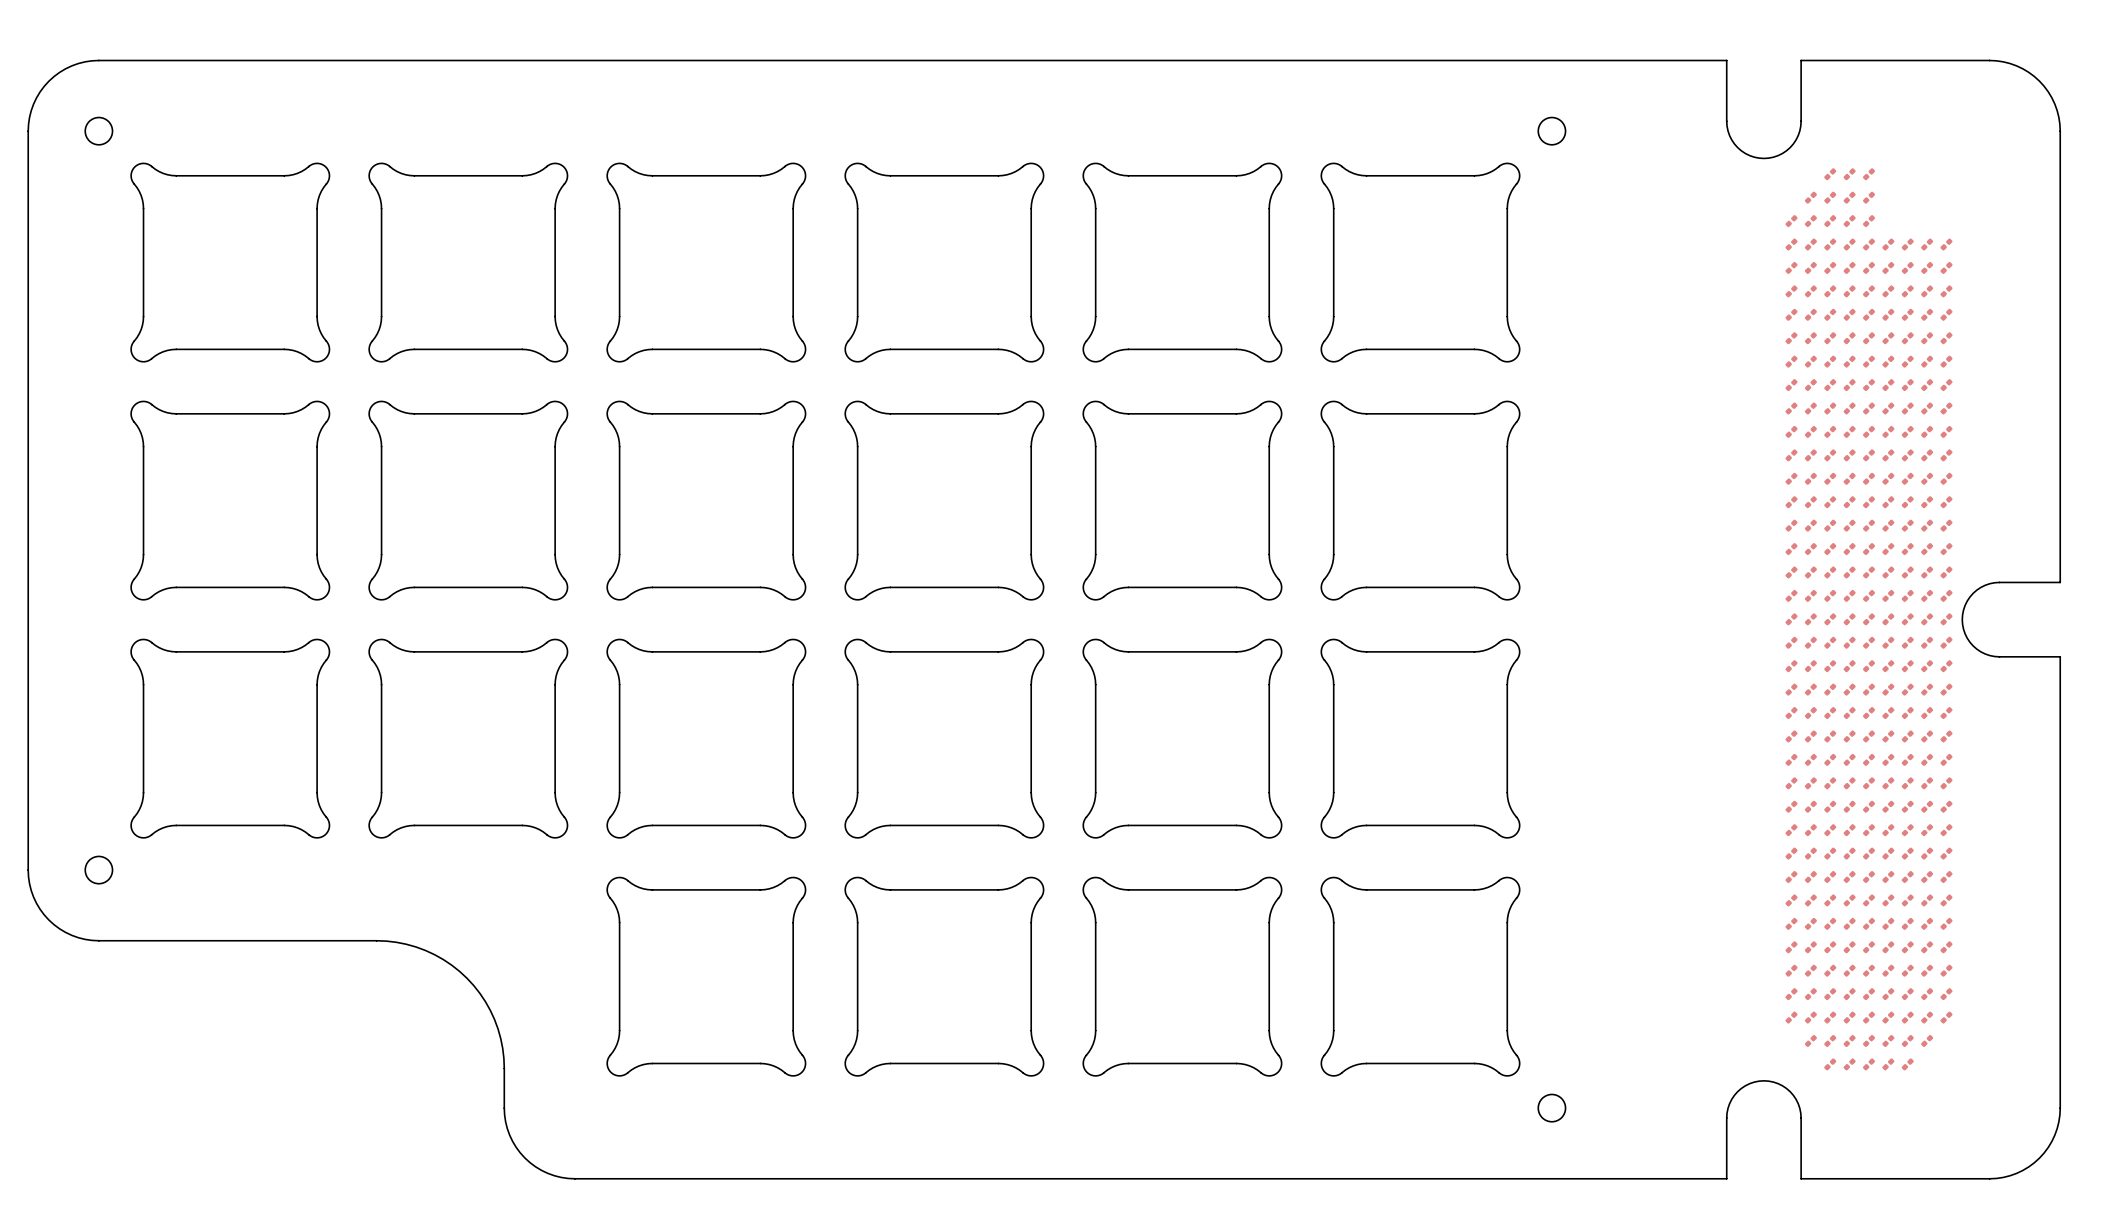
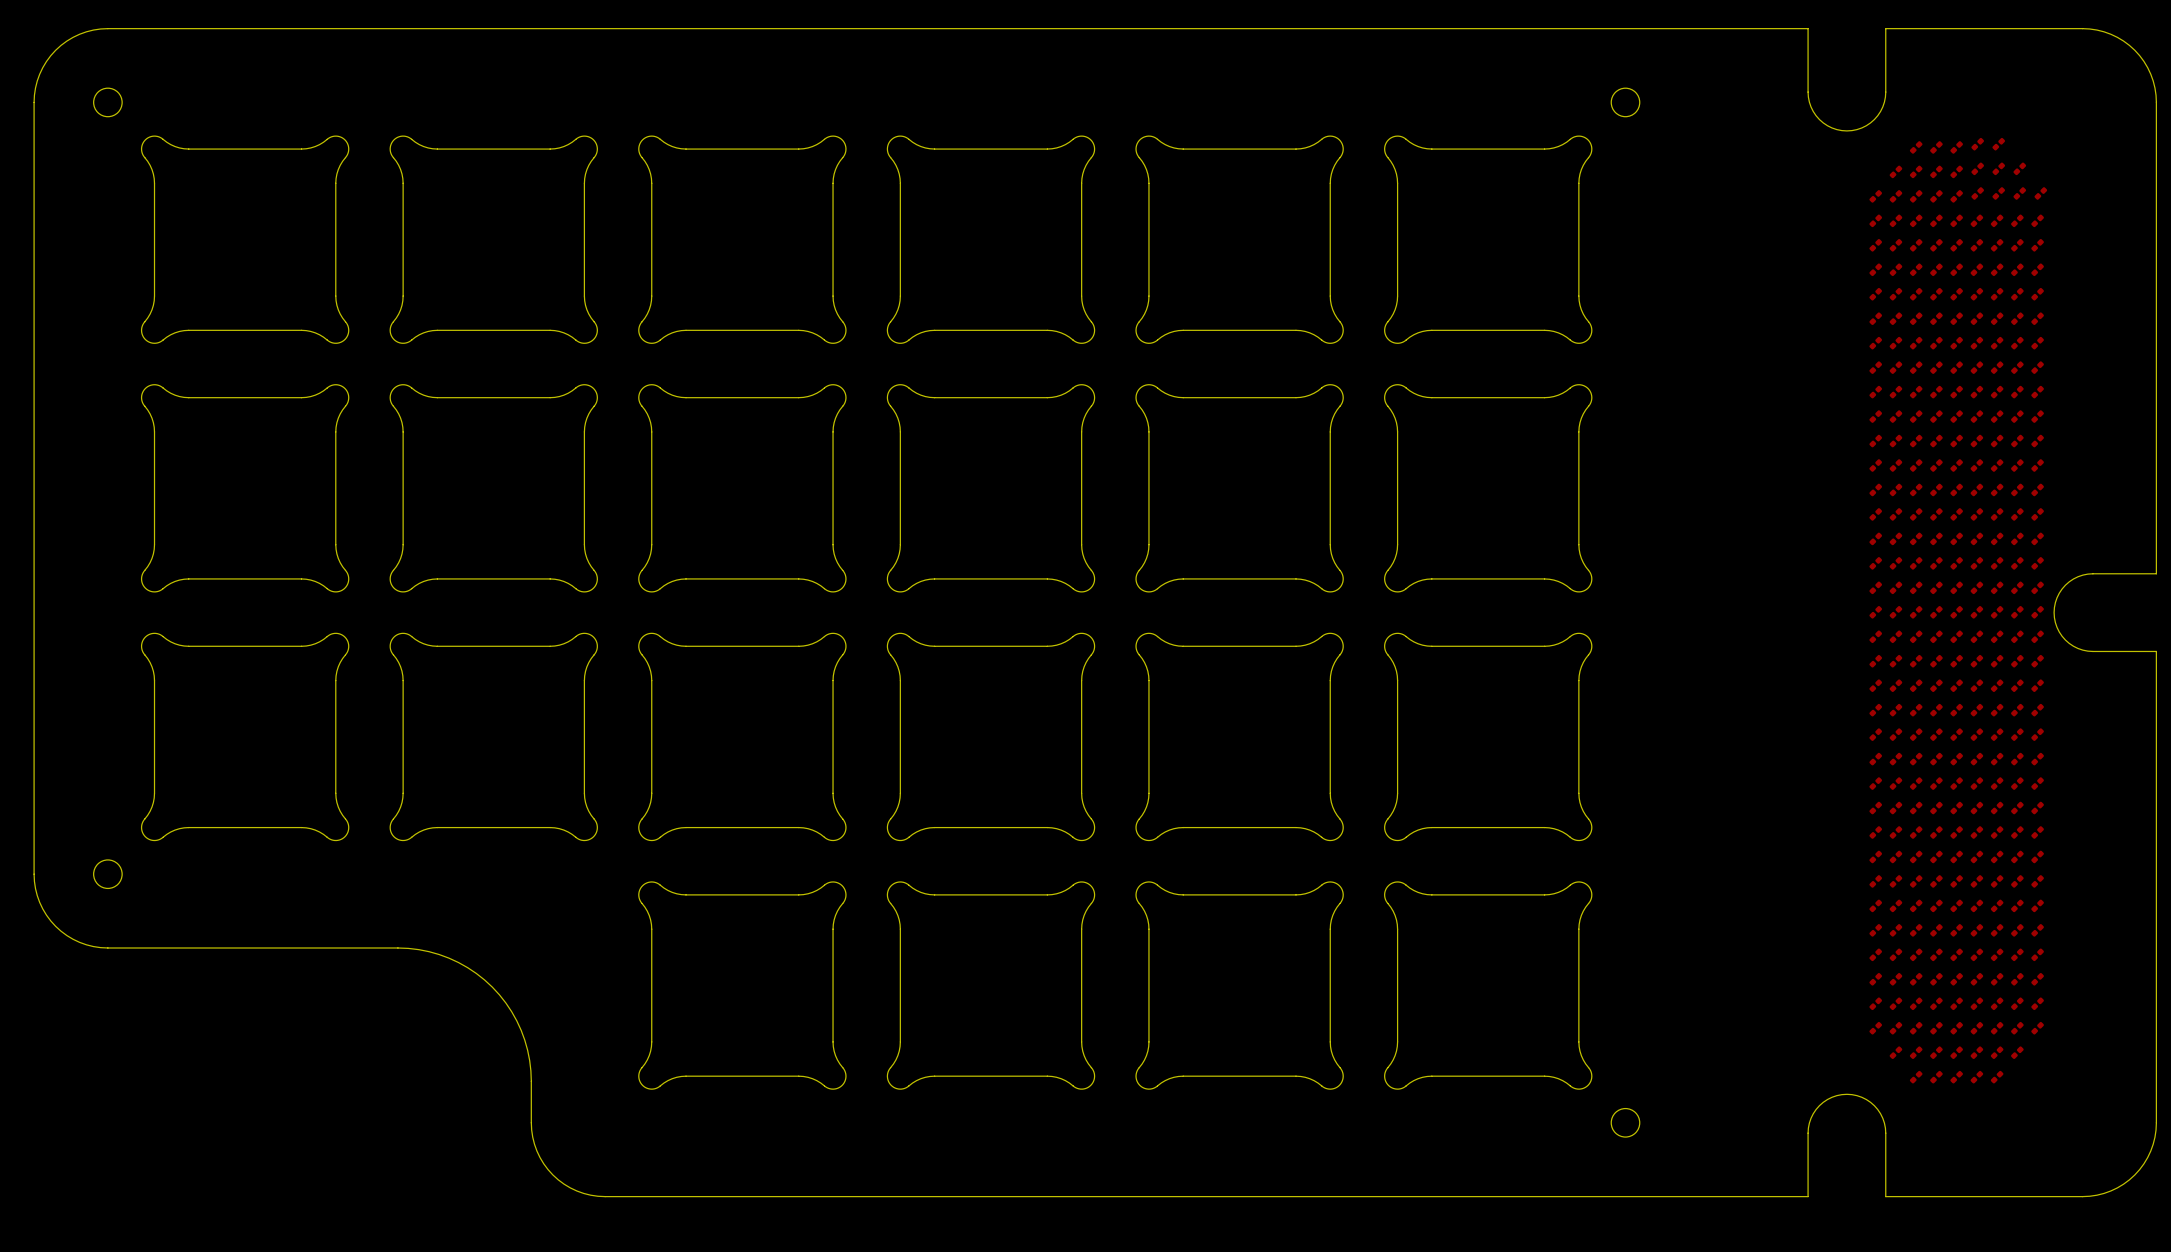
part: none -> (1977, 144)
part: none -> (1998, 144)
part: none -> (1977, 168)
part: none -> (1998, 168)
part: none -> (2019, 168)
part: none -> (1977, 193)
part: none -> (1998, 193)
part: none -> (2019, 193)
part: none -> (2040, 193)

